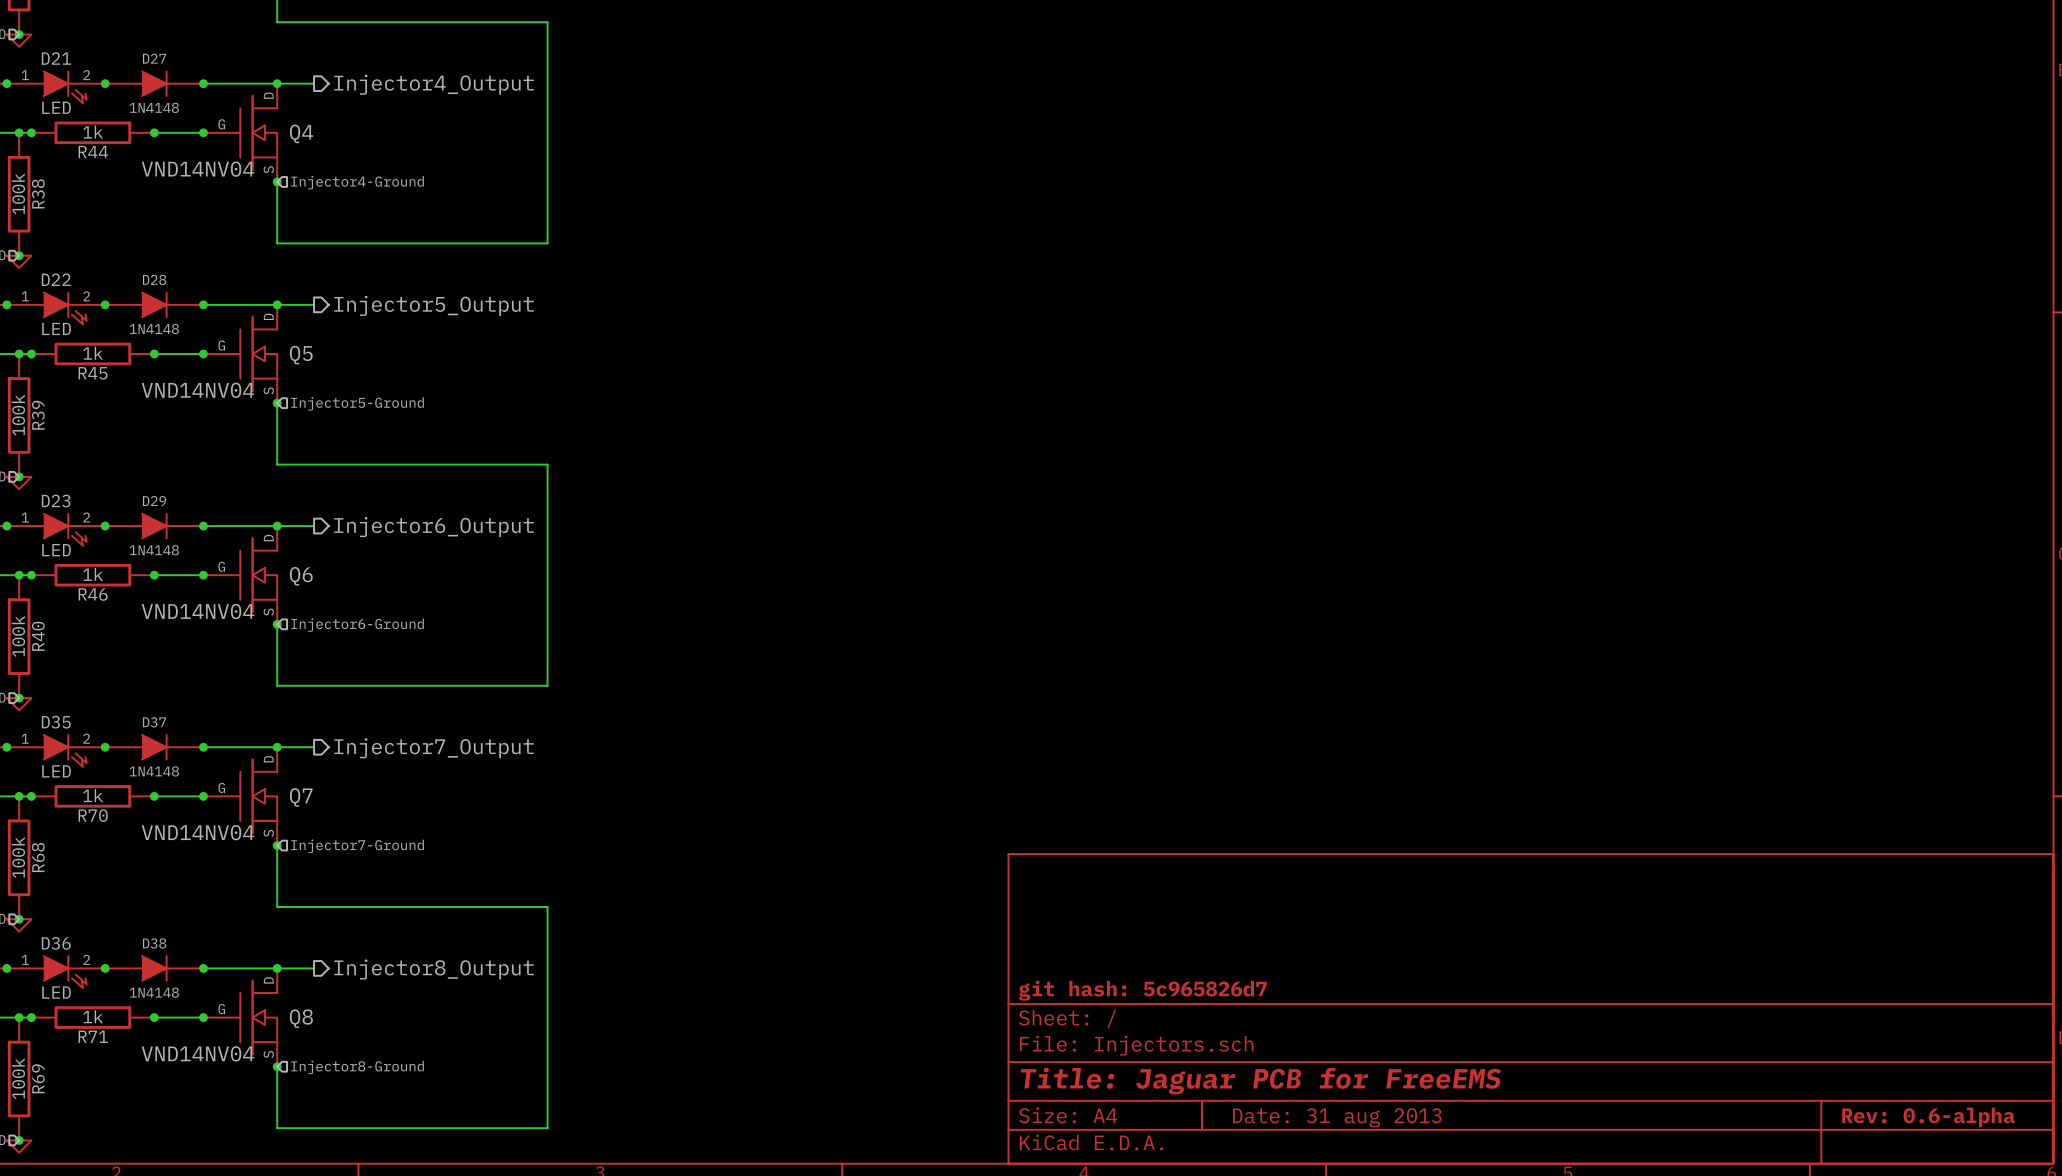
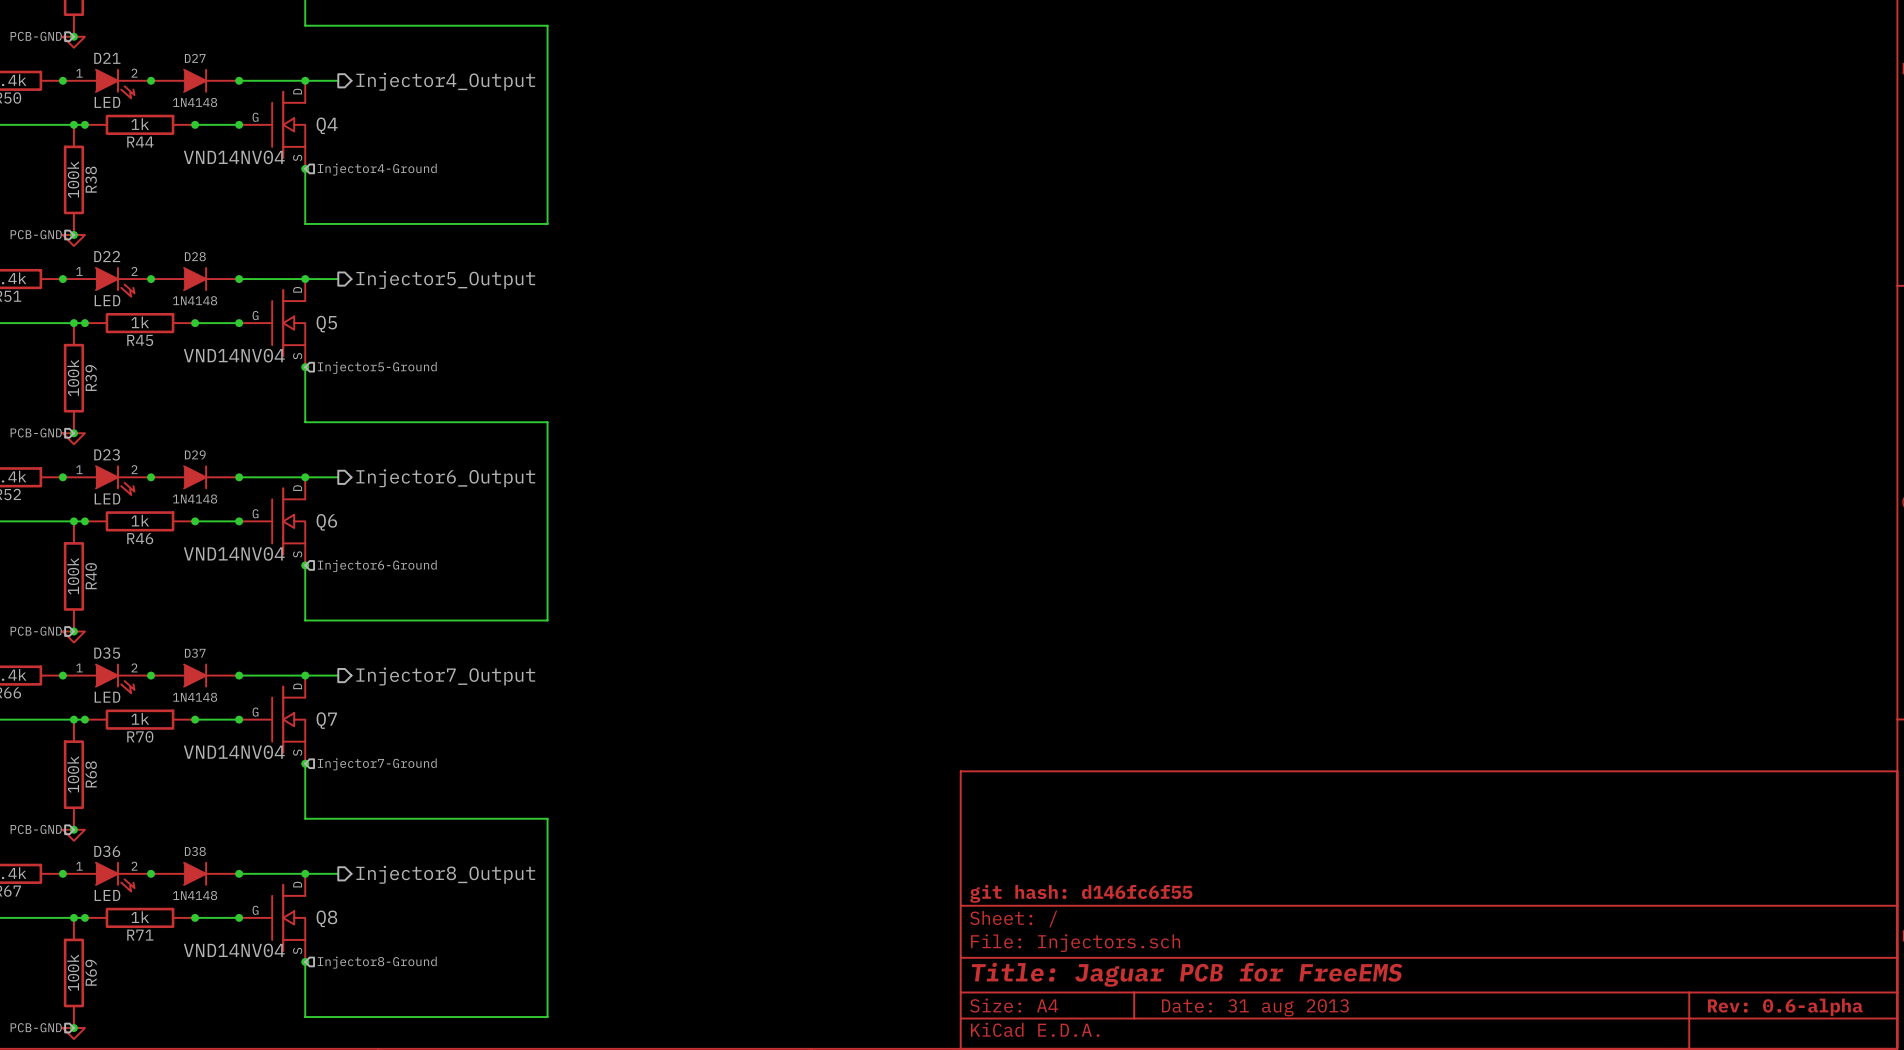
title block: git hash: 5c965826d7 (1142, 990) -> git hash: d146fc6f55 (1081, 893)

